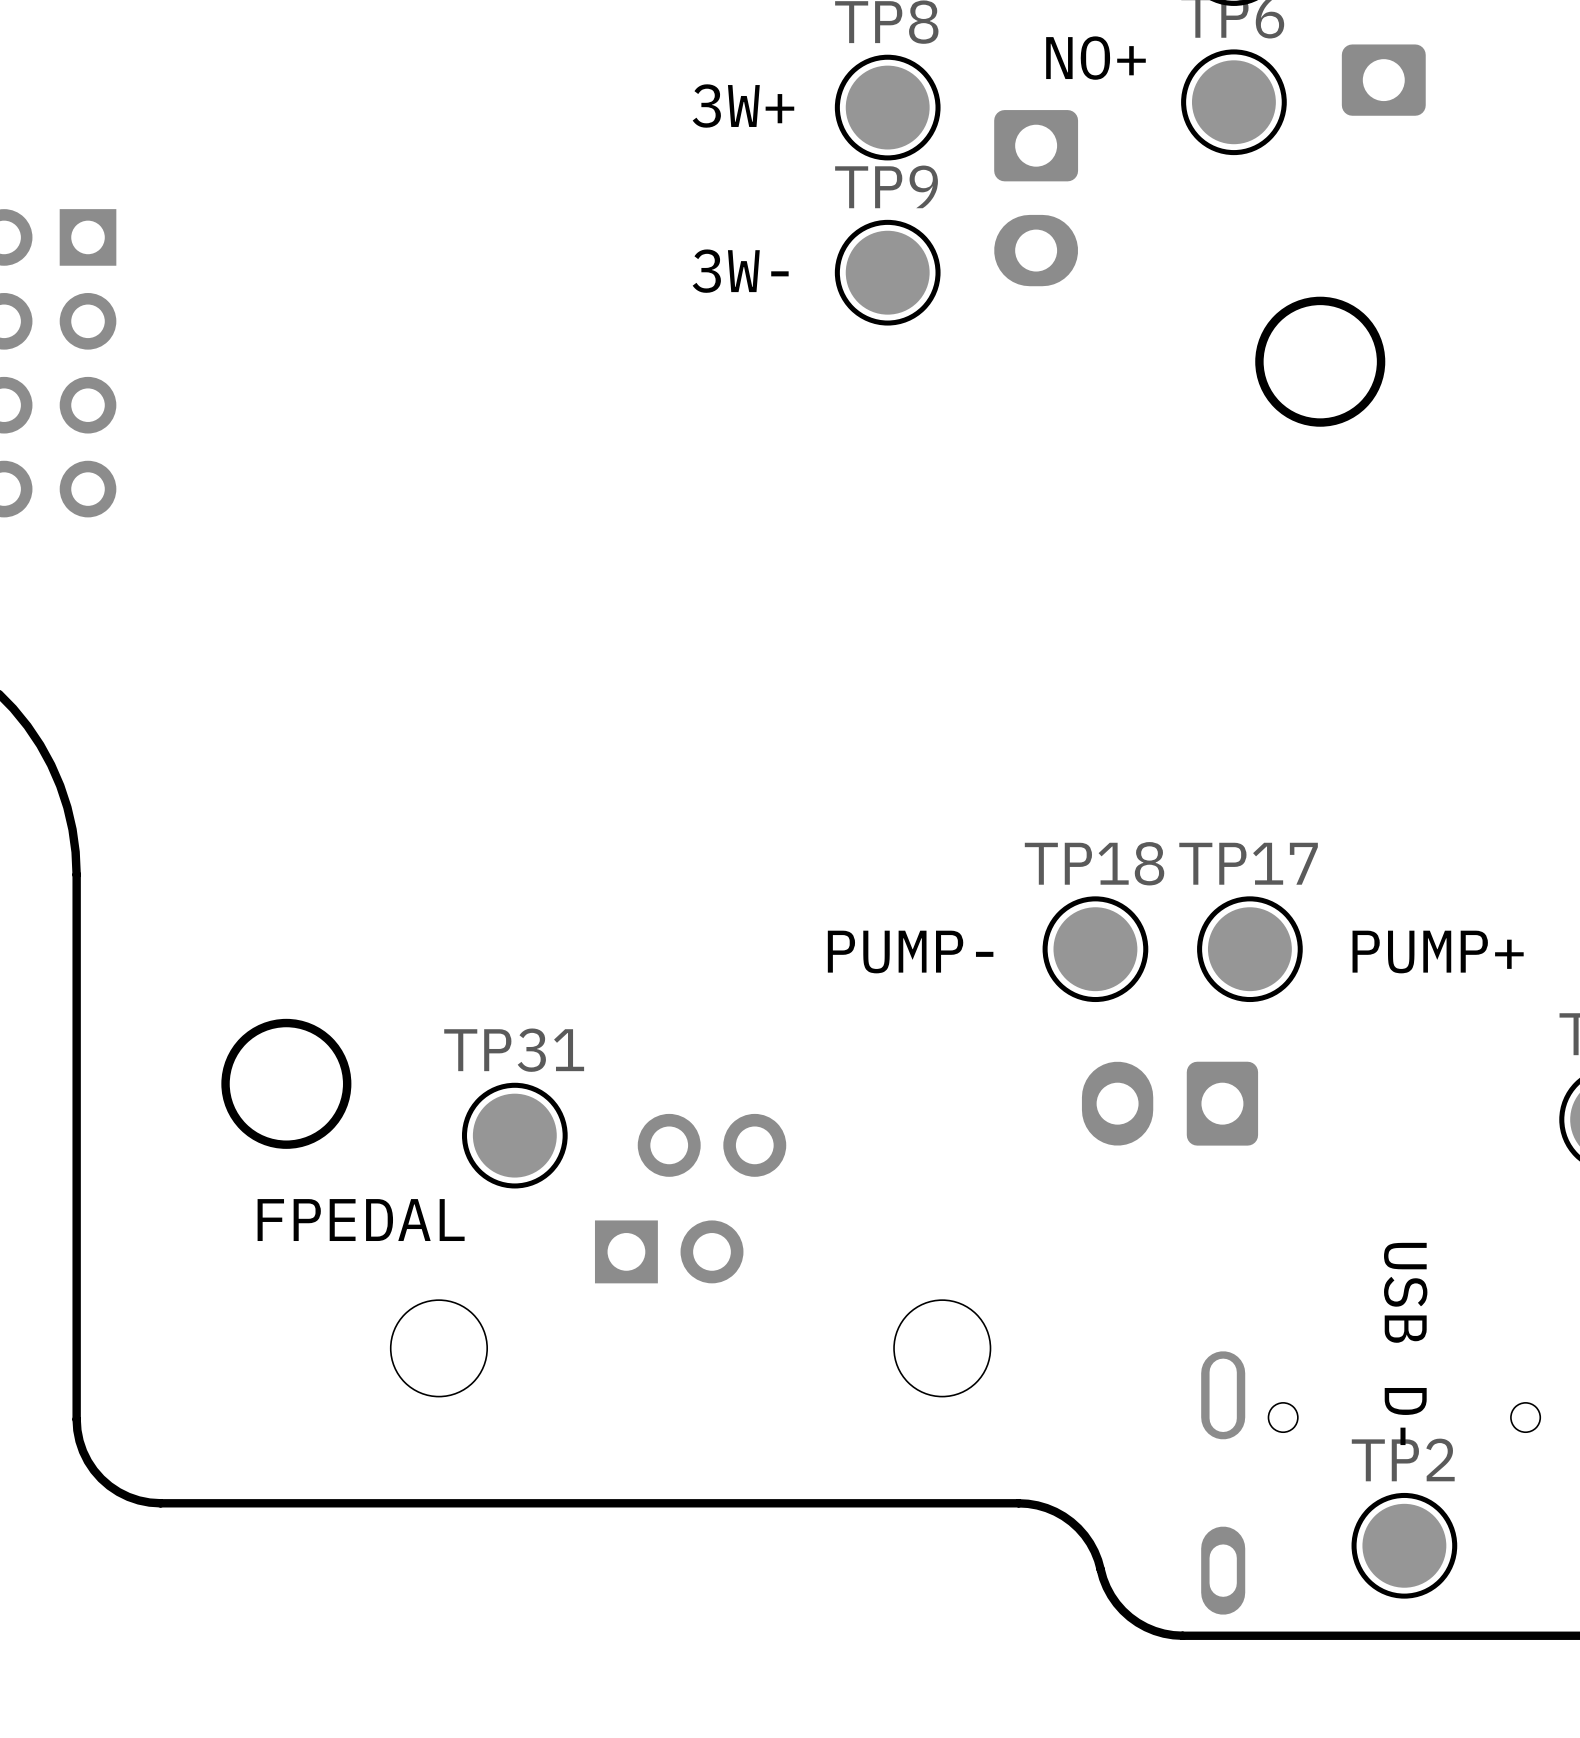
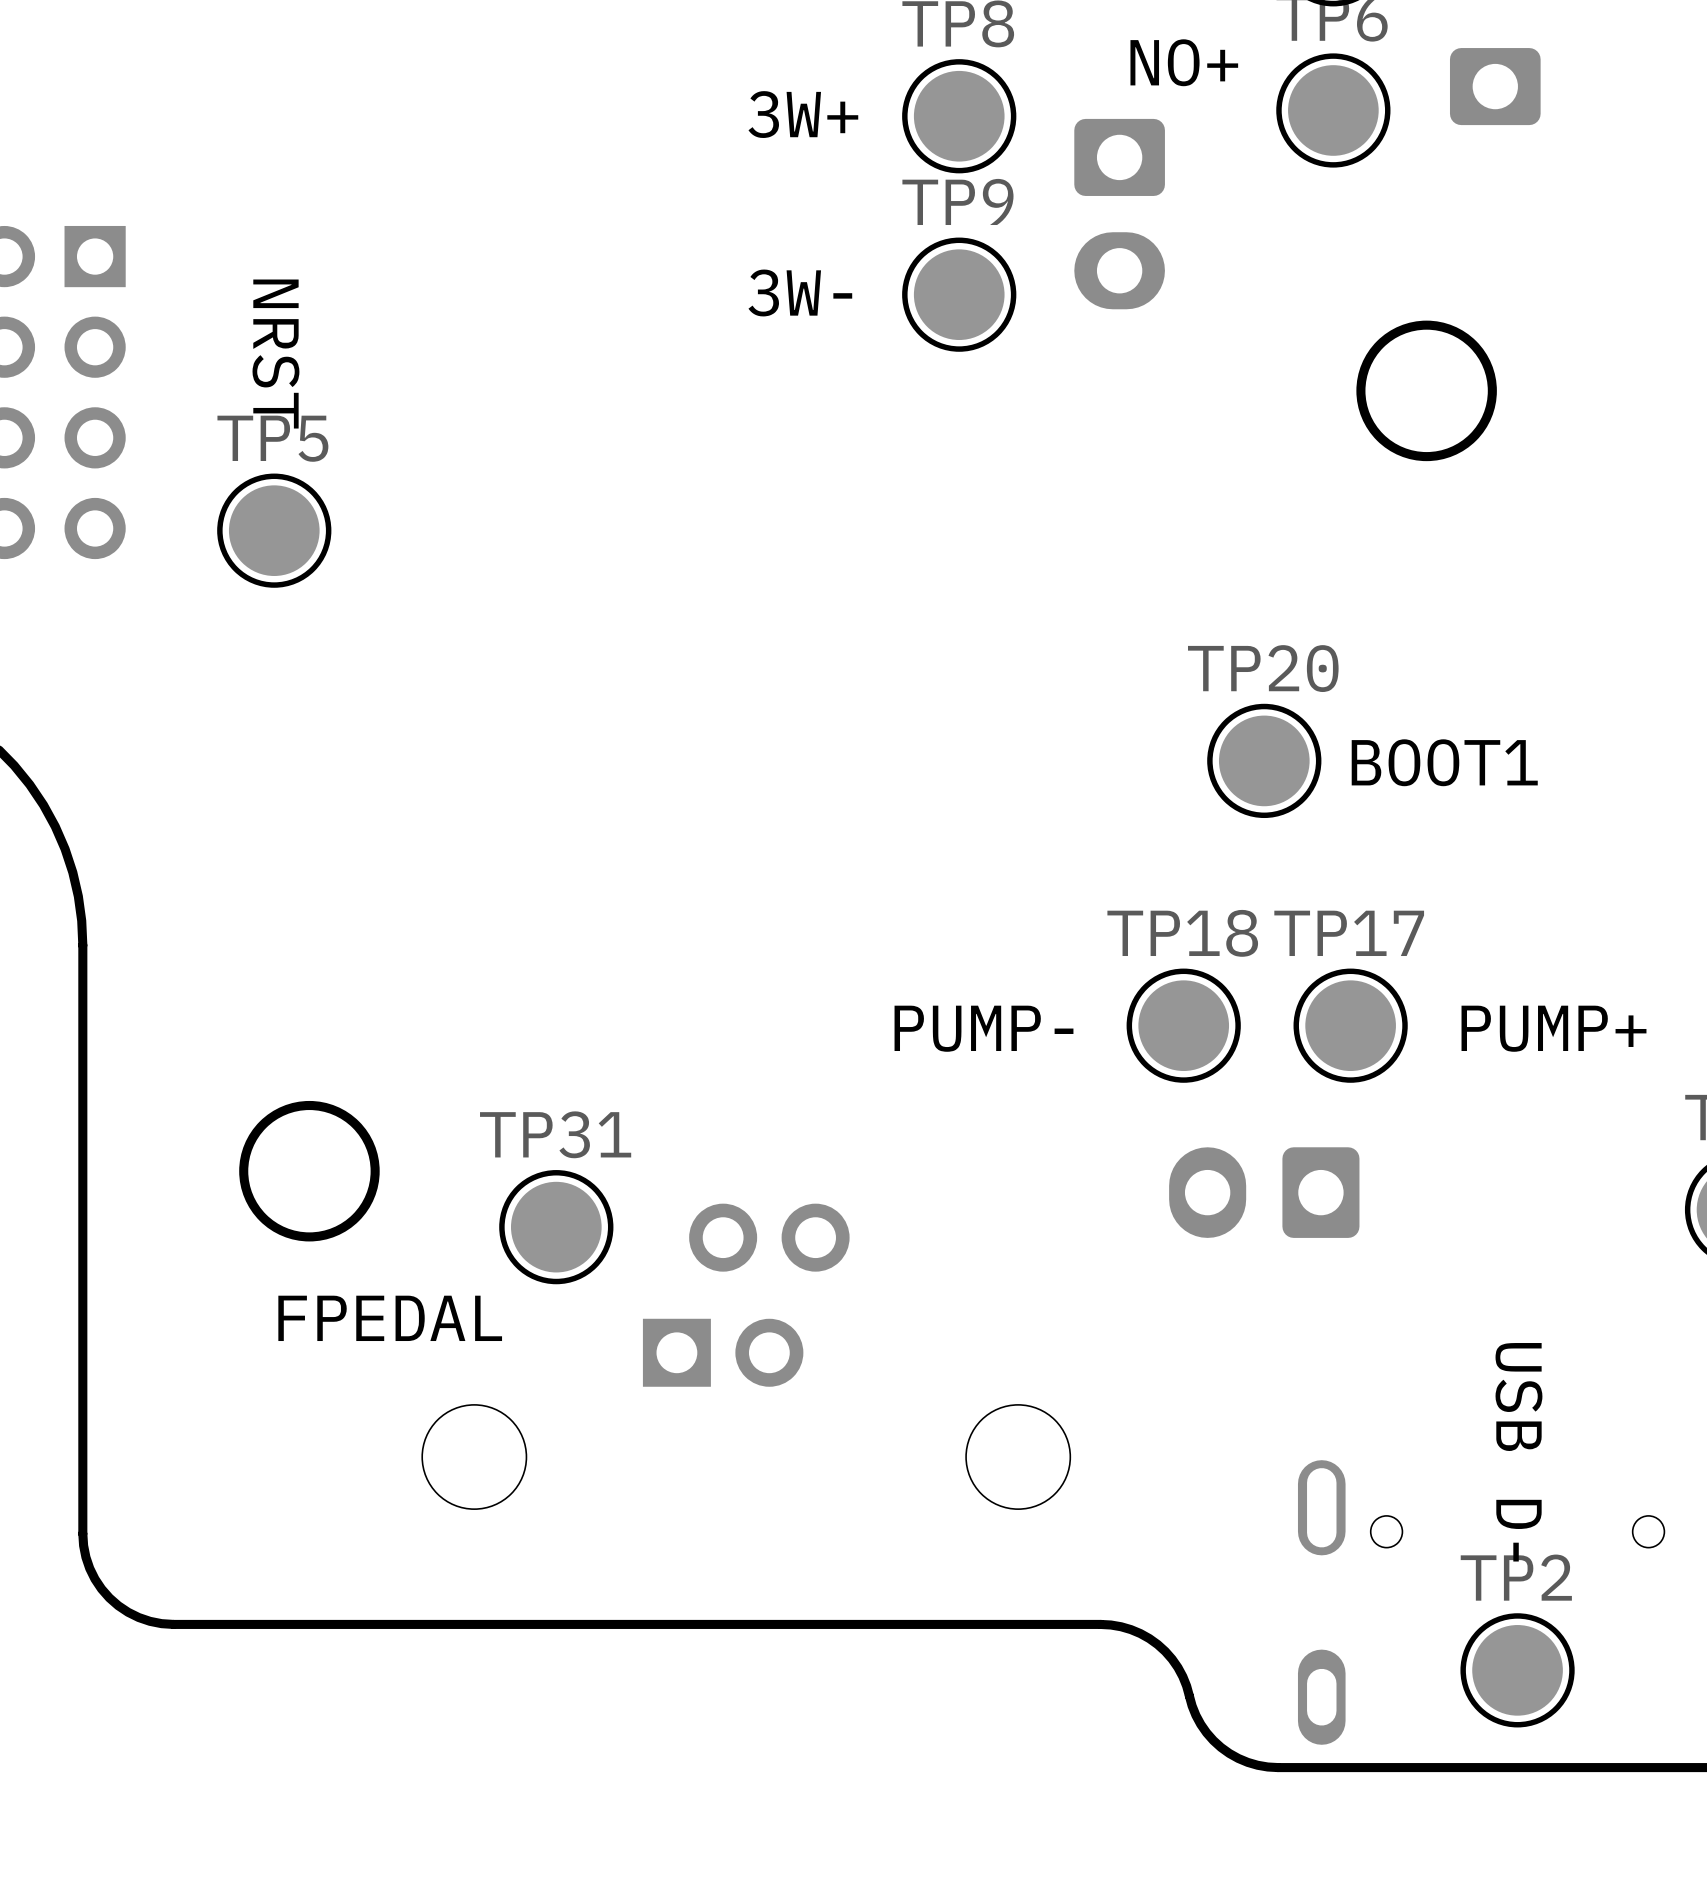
TP5: none -> NRST (274, 530)
TP20: none -> BOOT1 (1264, 760)

